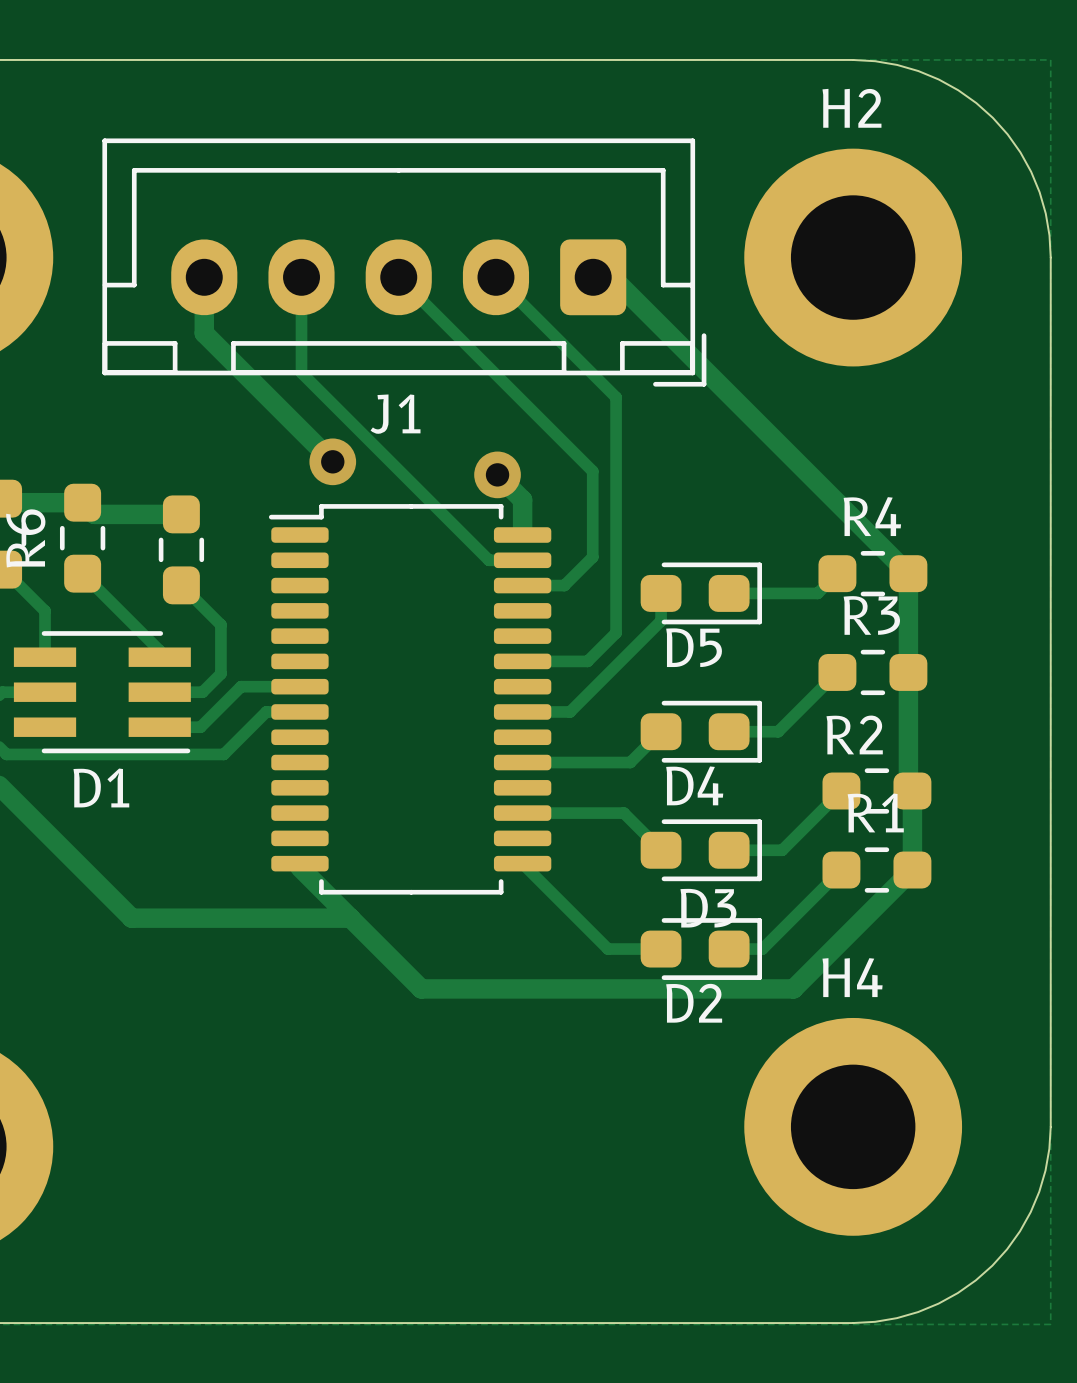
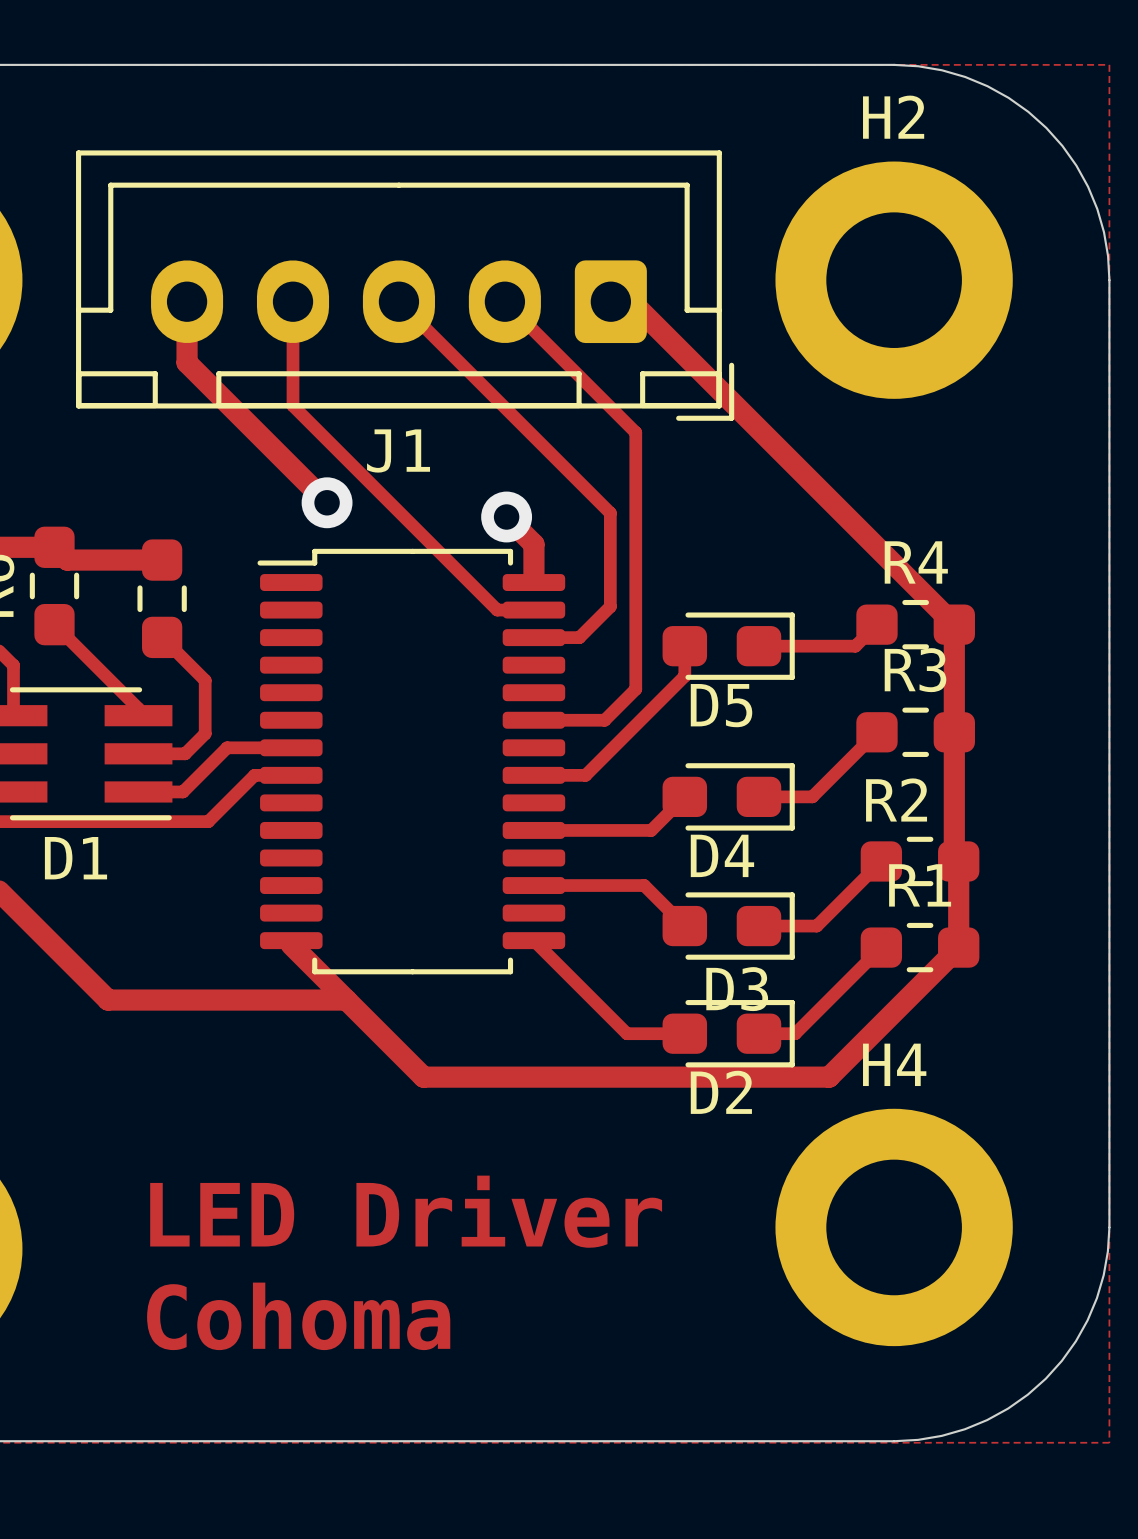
text: none -> LED Driver (406, 1211)
text: none -> Cohoma (298, 1316)

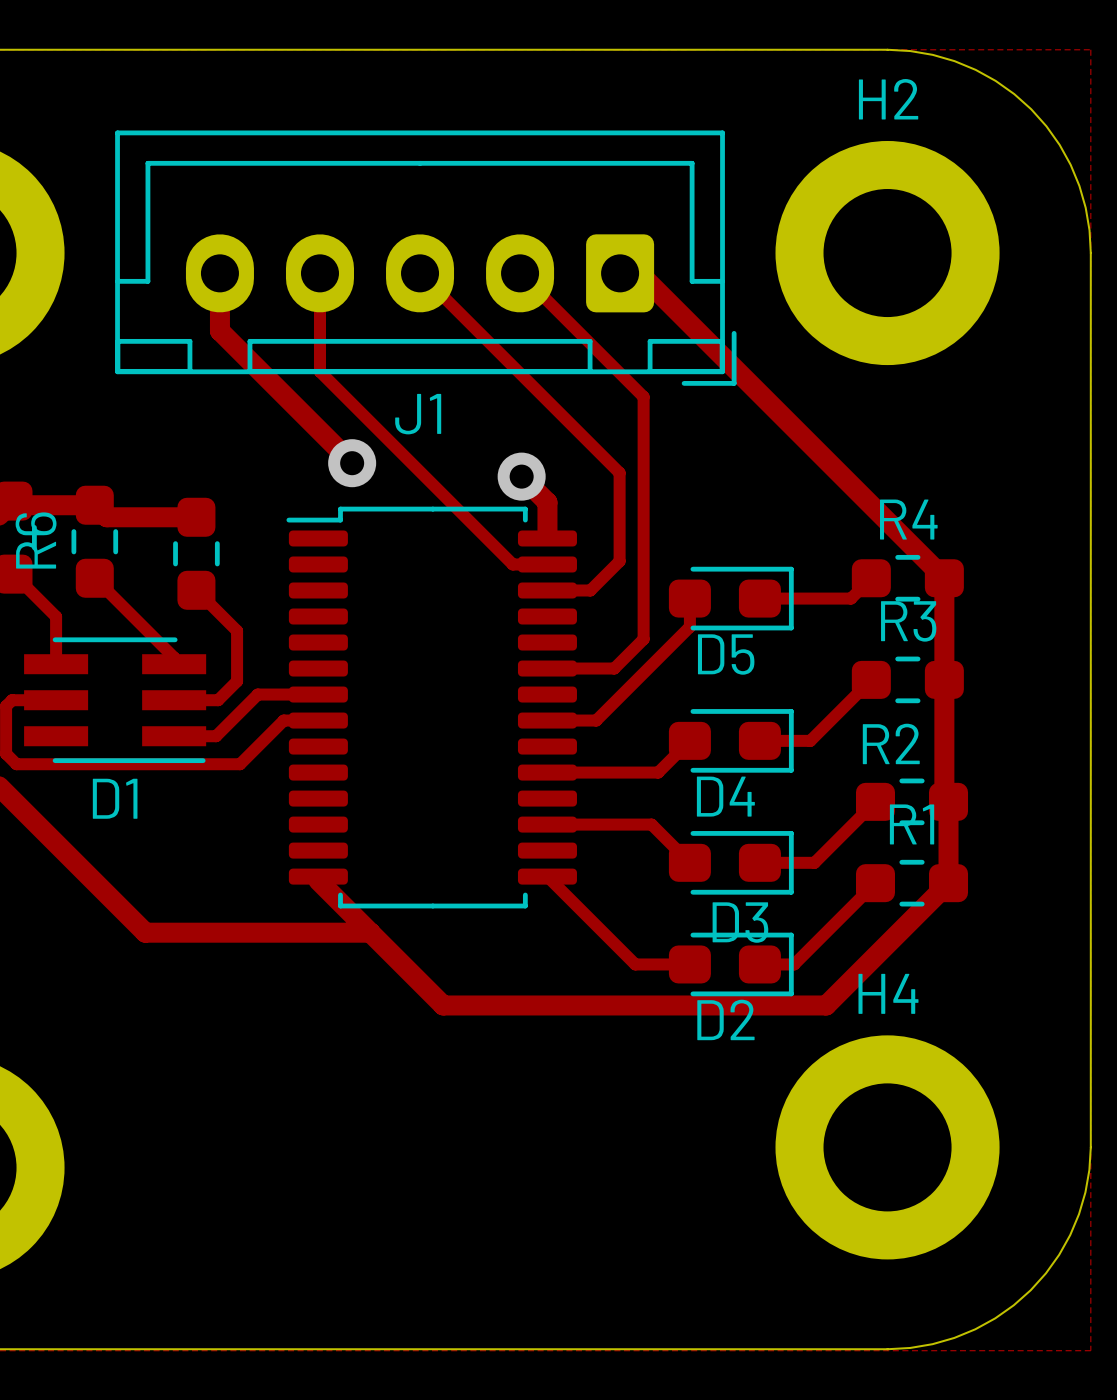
text: LED Driver (406, 1211) -> none
text: Cohoma (298, 1316) -> none

